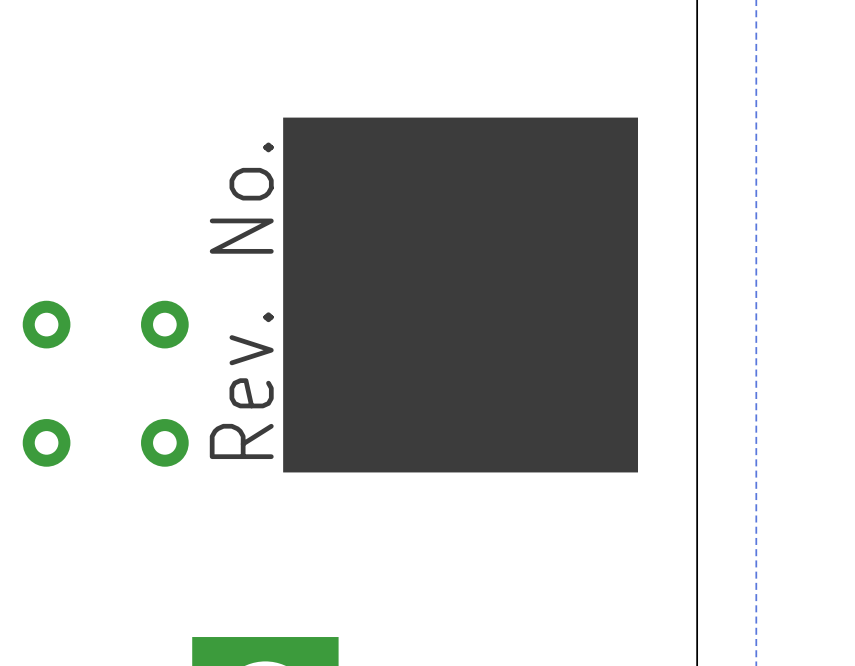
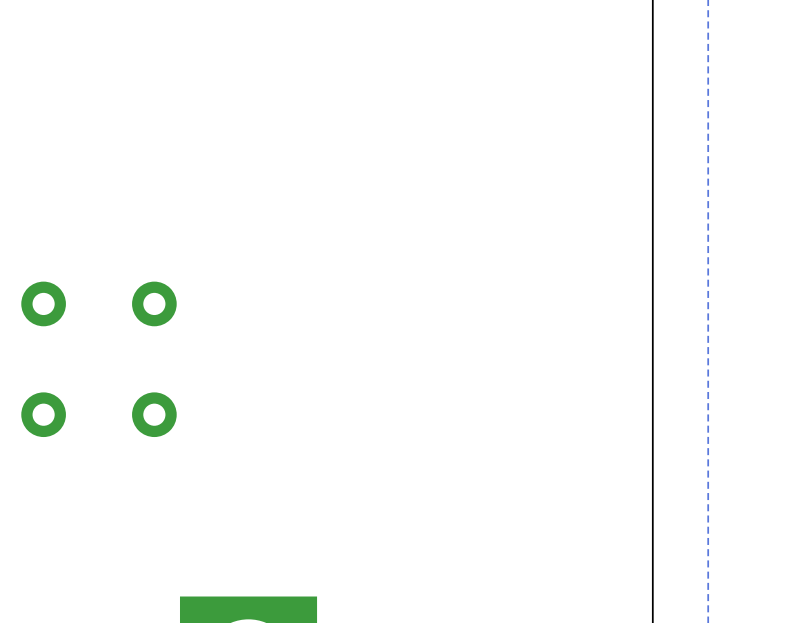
drawing: [283, 117, 639, 473] -> none
text: Rev. No. (241, 300) -> none

